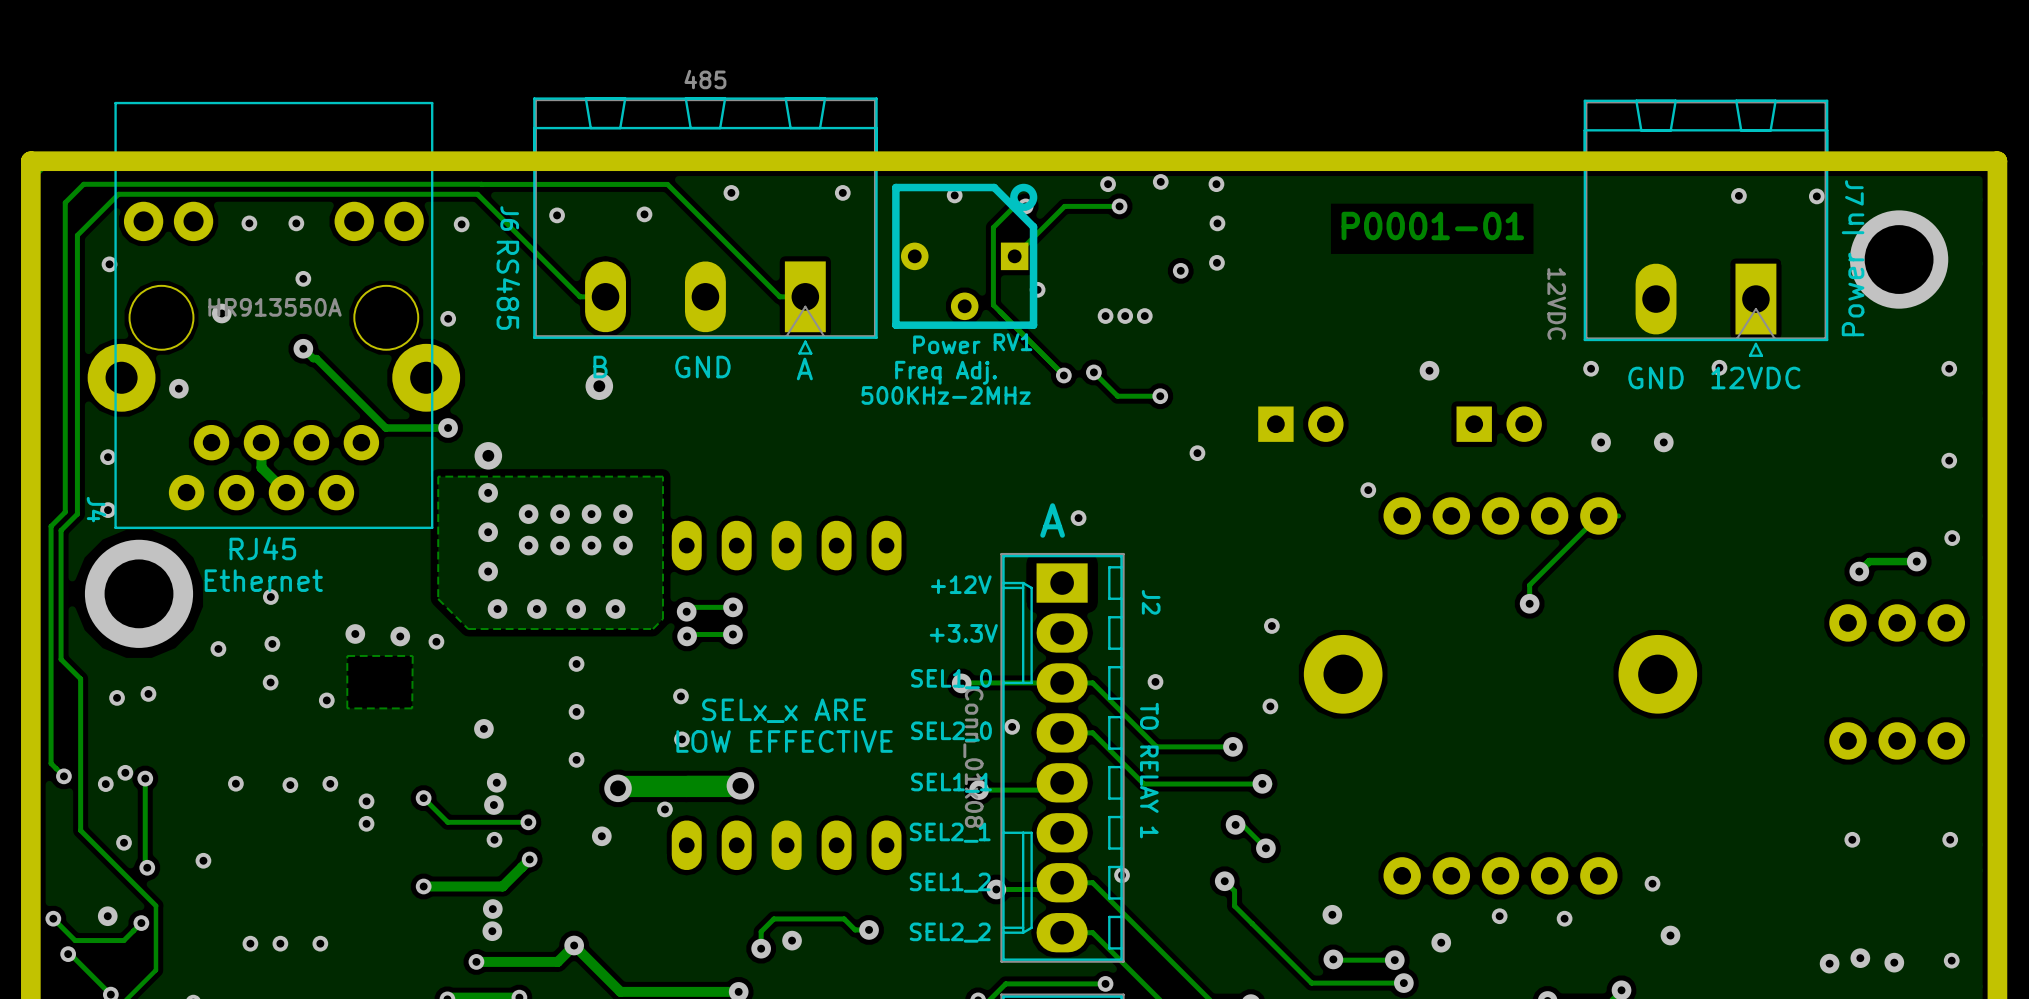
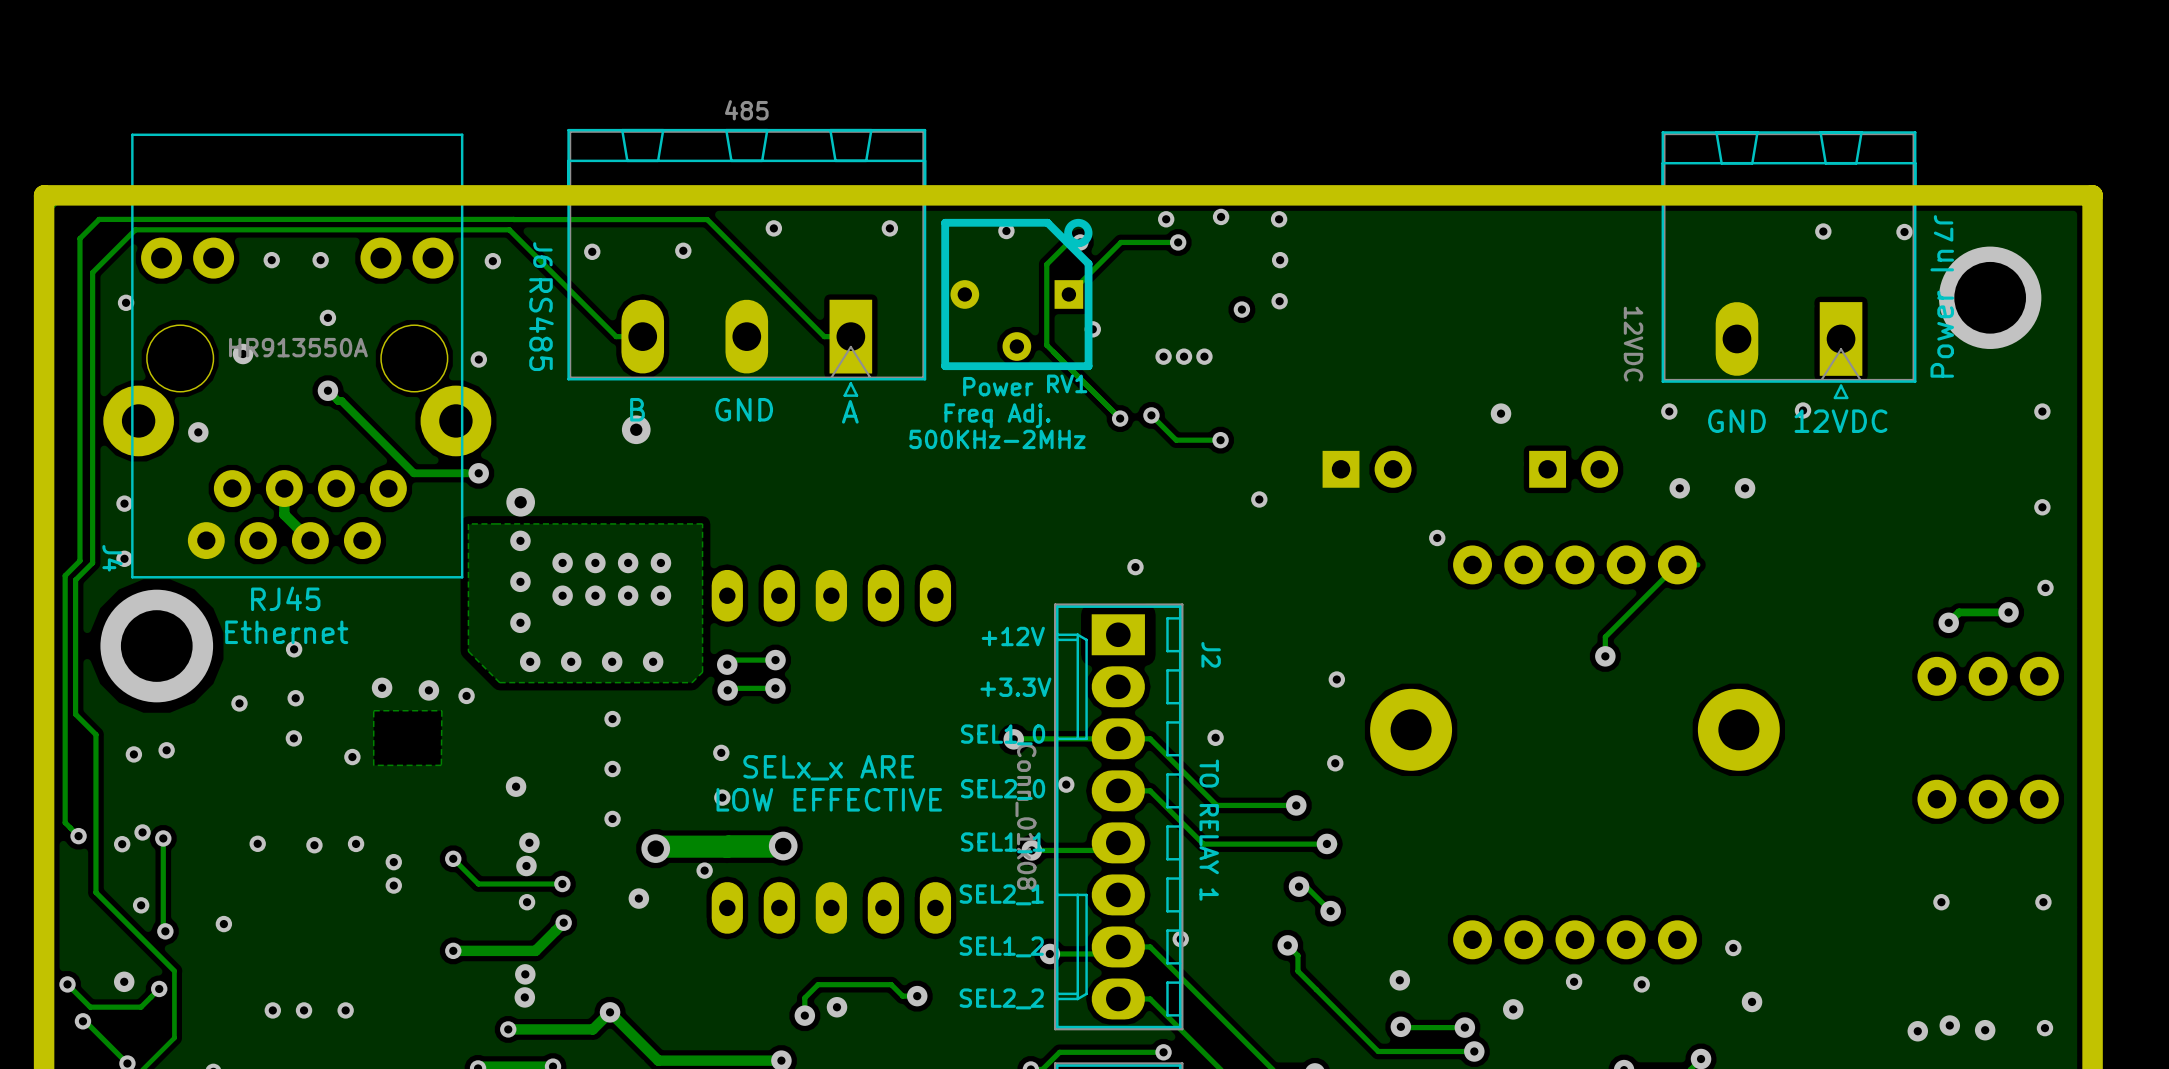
text: P0001-01 (1432, 226) -> none
text: A (1052, 520) -> none

